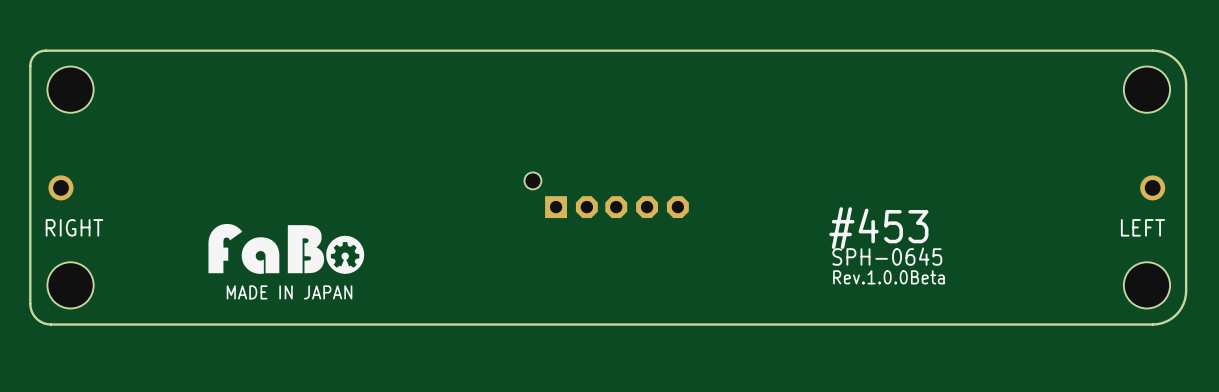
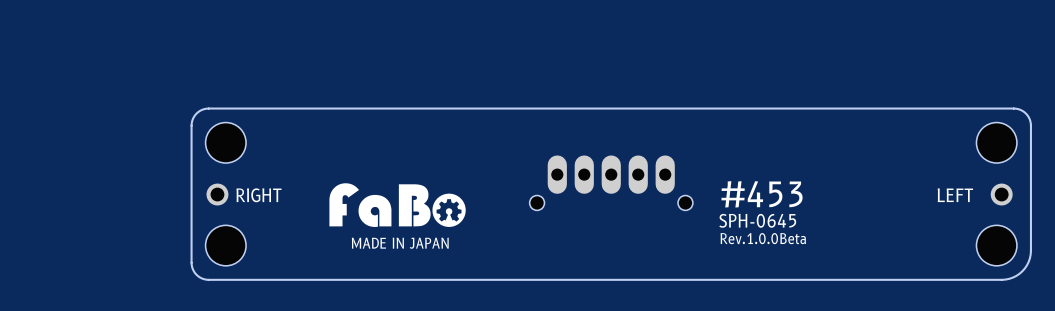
hole: (70, 89) -> none
hole position: (1146, 89) -> (996, 142)
board edge: (1186, 148) (1184, 75) (1179, 63) (1173, 57) (1157, 50) (45, 50) (36, 53) (31, 60) (30, 65) (30, 303) (34, 316) (40, 321) (50, 324) (246, 324) -> (1030, 125) (1025, 113) (1013, 108) (206, 108) (196, 113) (191, 123) (191, 262) (196, 274) (208, 279)
hole: none -> (225, 142)
part position: (60, 187) -> (217, 194)
part position: (1152, 187) -> (1001, 194)
part: (606, 195) -> none
part: none -> (611, 182)
text position: RIGHT (74, 227) -> RIGHT (258, 195)
text position: LEFT (1142, 227) -> LEFT (955, 195)
drawing position: (286, 248) -> (397, 205)
hole: (70, 285) -> none
hole: none -> (225, 245)
text position: MADE IN JAPAN (289, 292) -> MADE IN JAPAN (400, 243)

